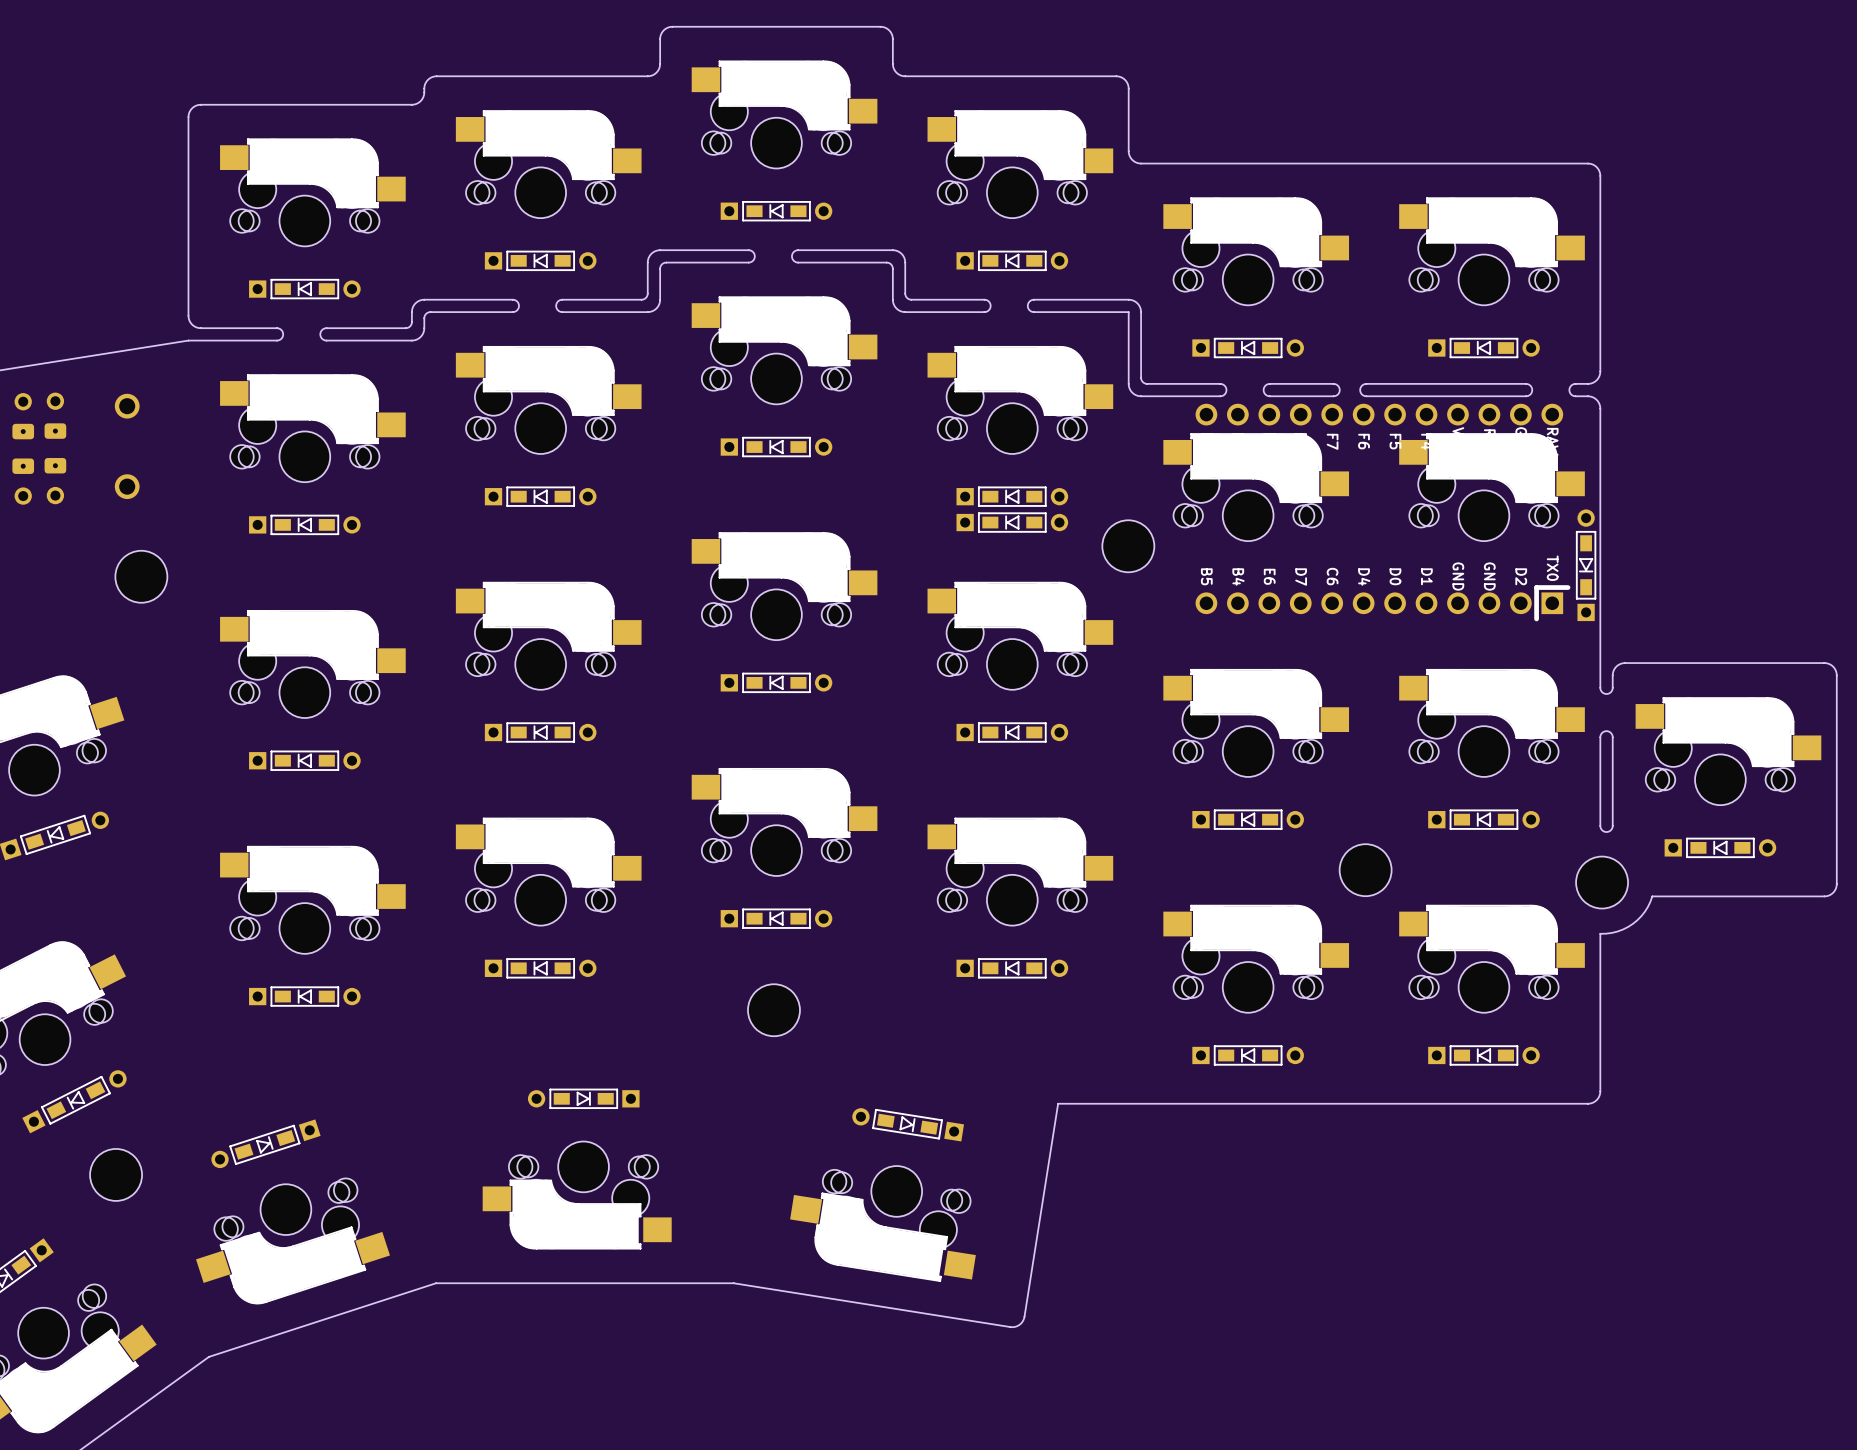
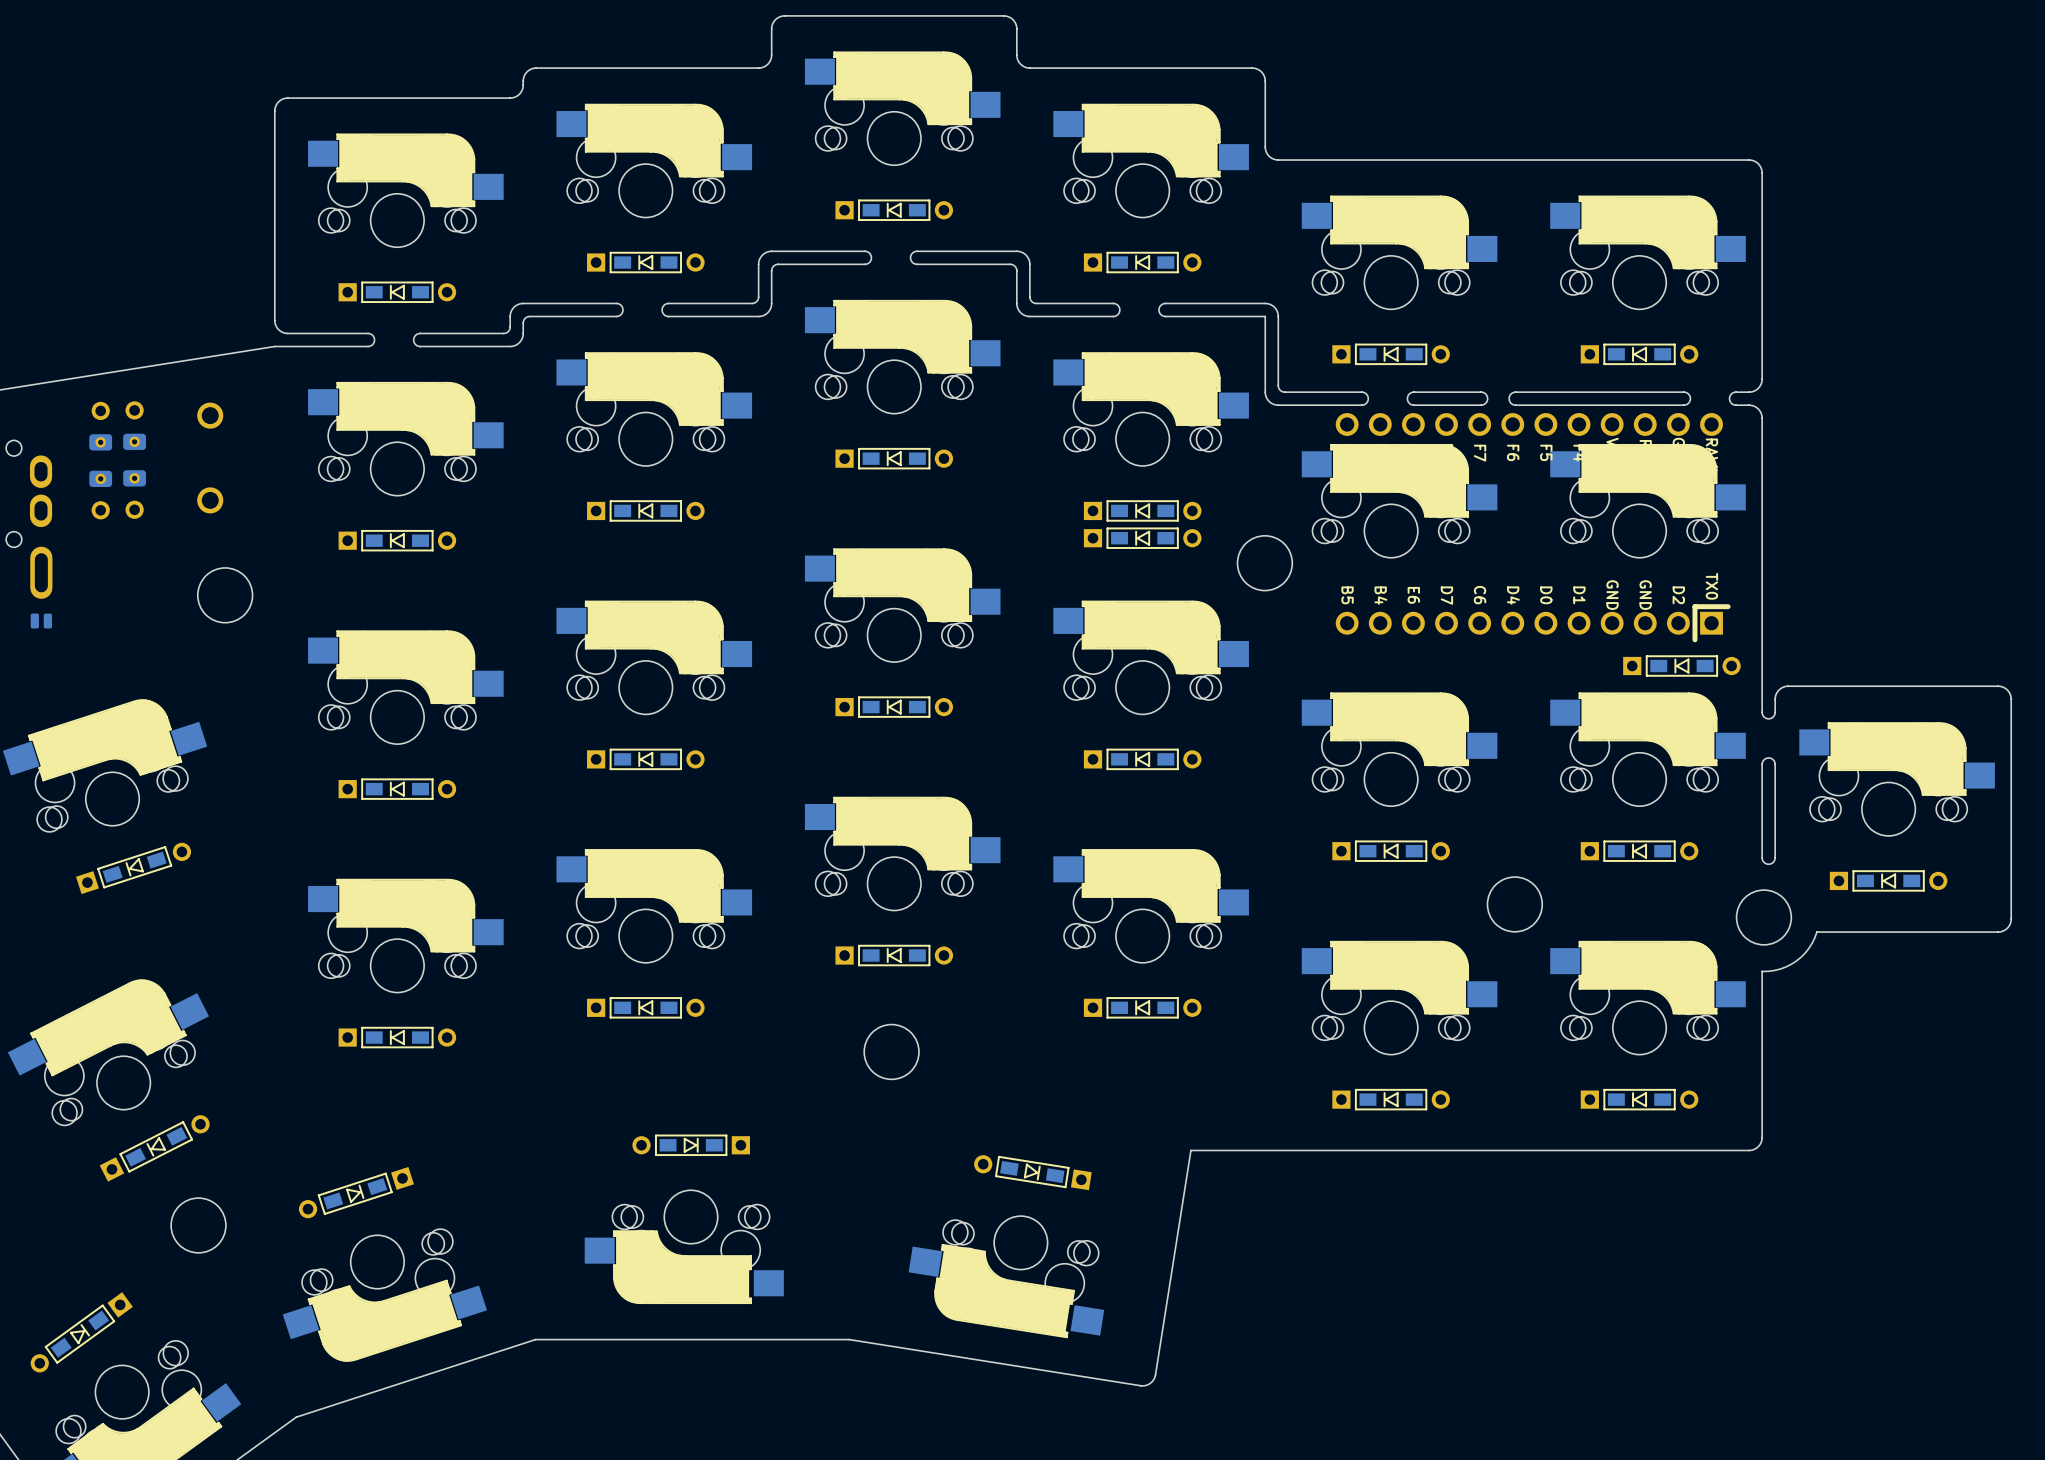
part rotation: 0° (1586, 565) -> 90° clockwise (1681, 666)
part position: (1586, 565) -> (1681, 666)

